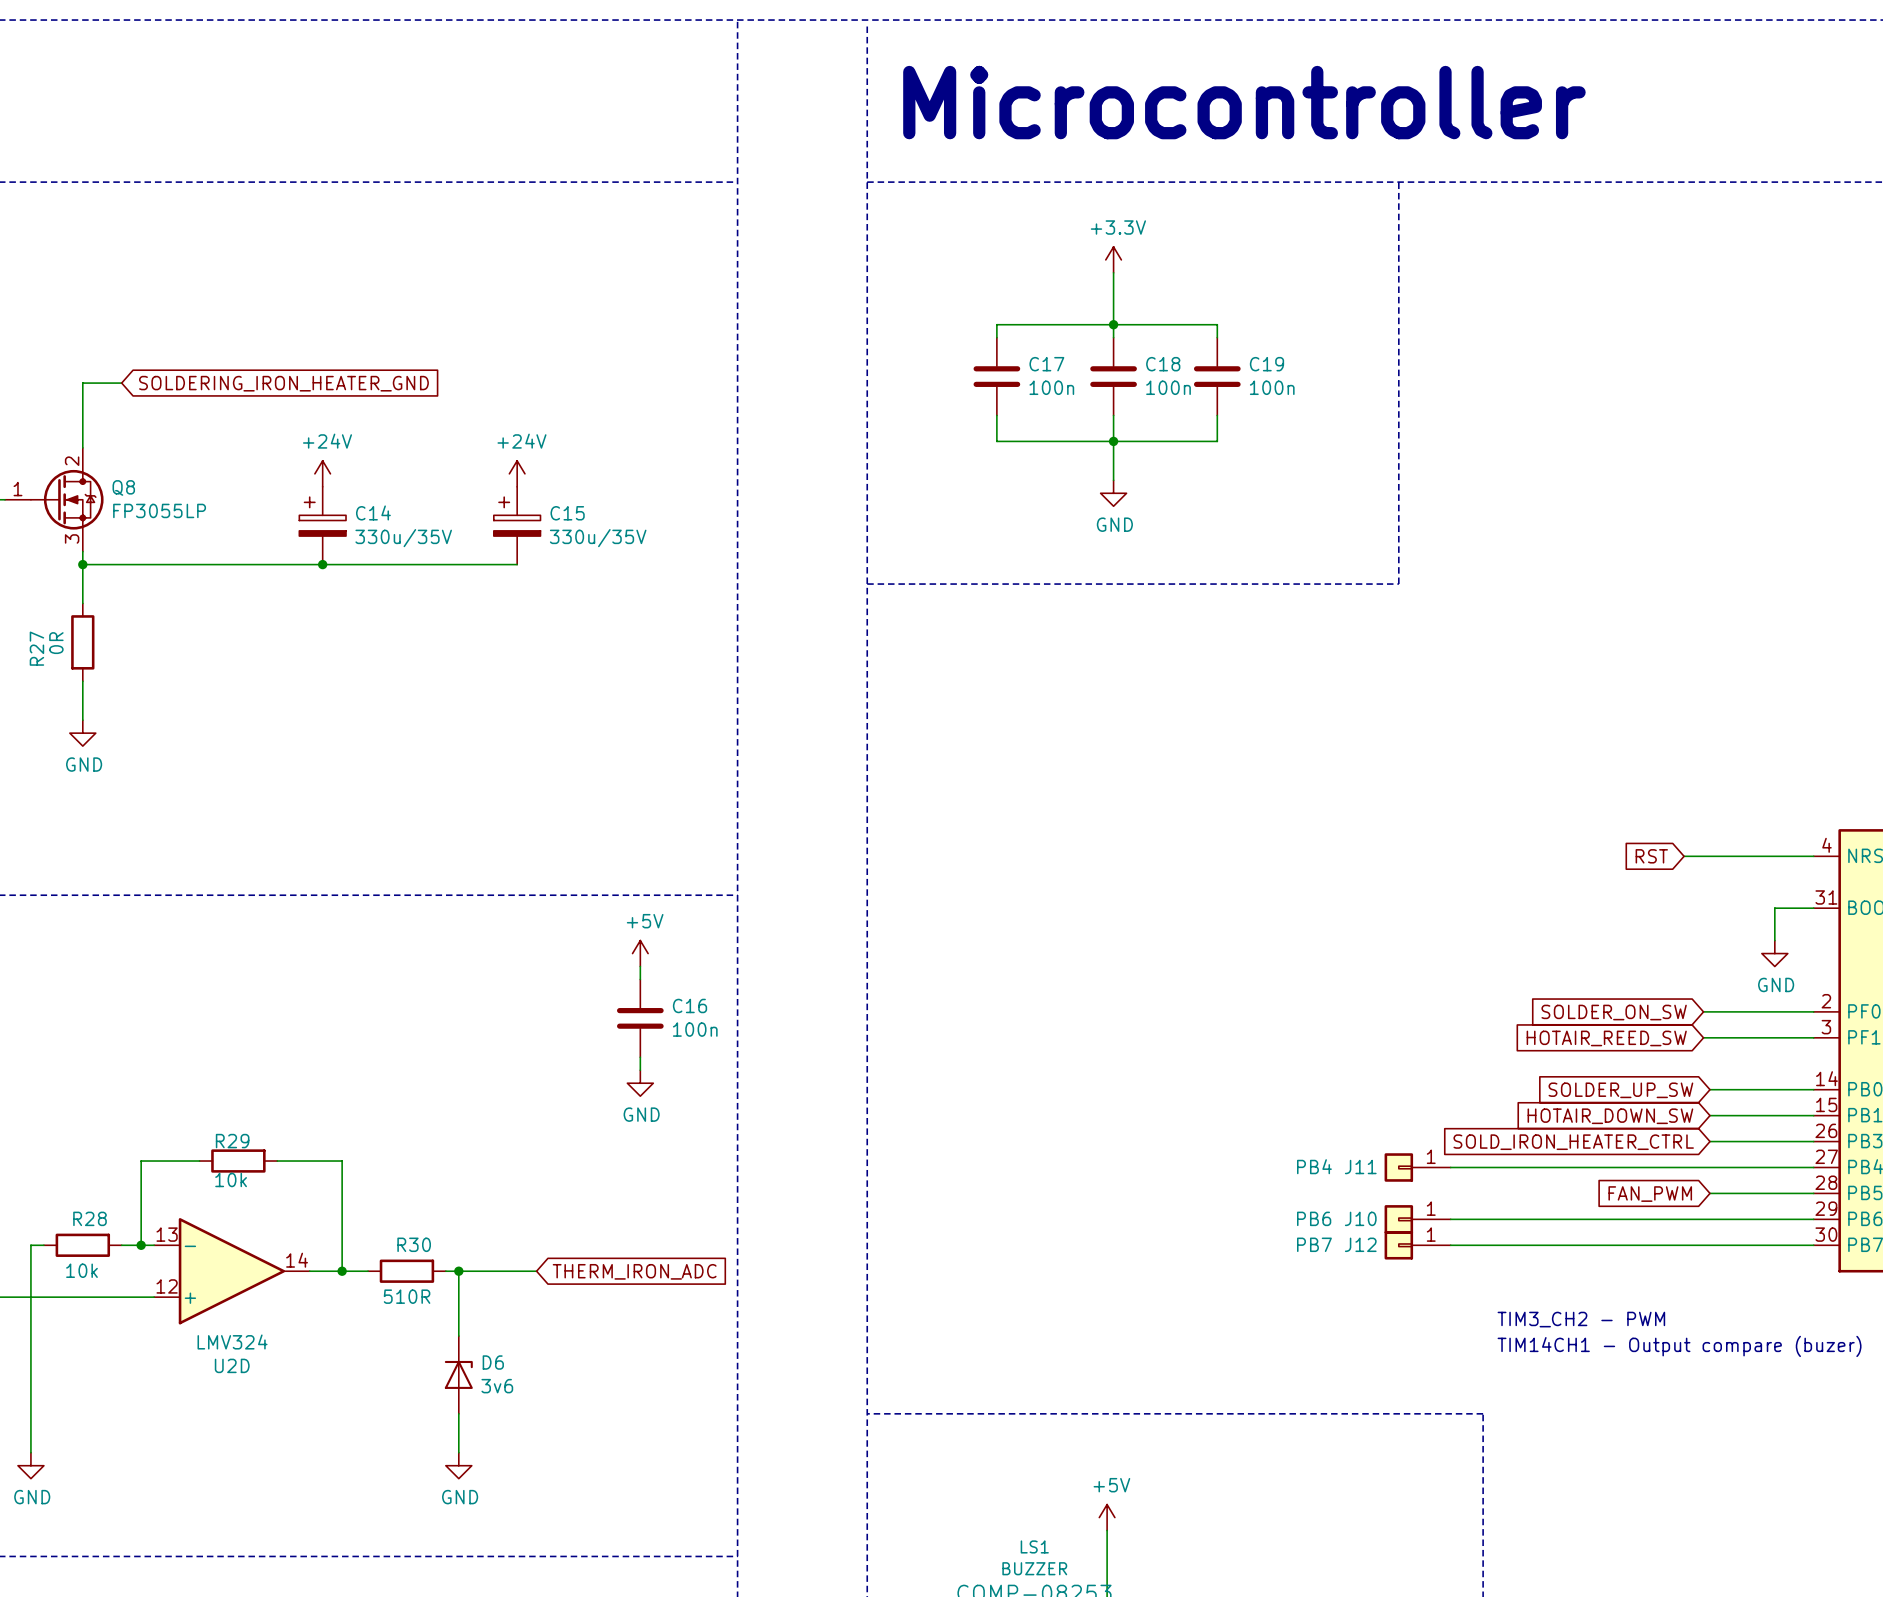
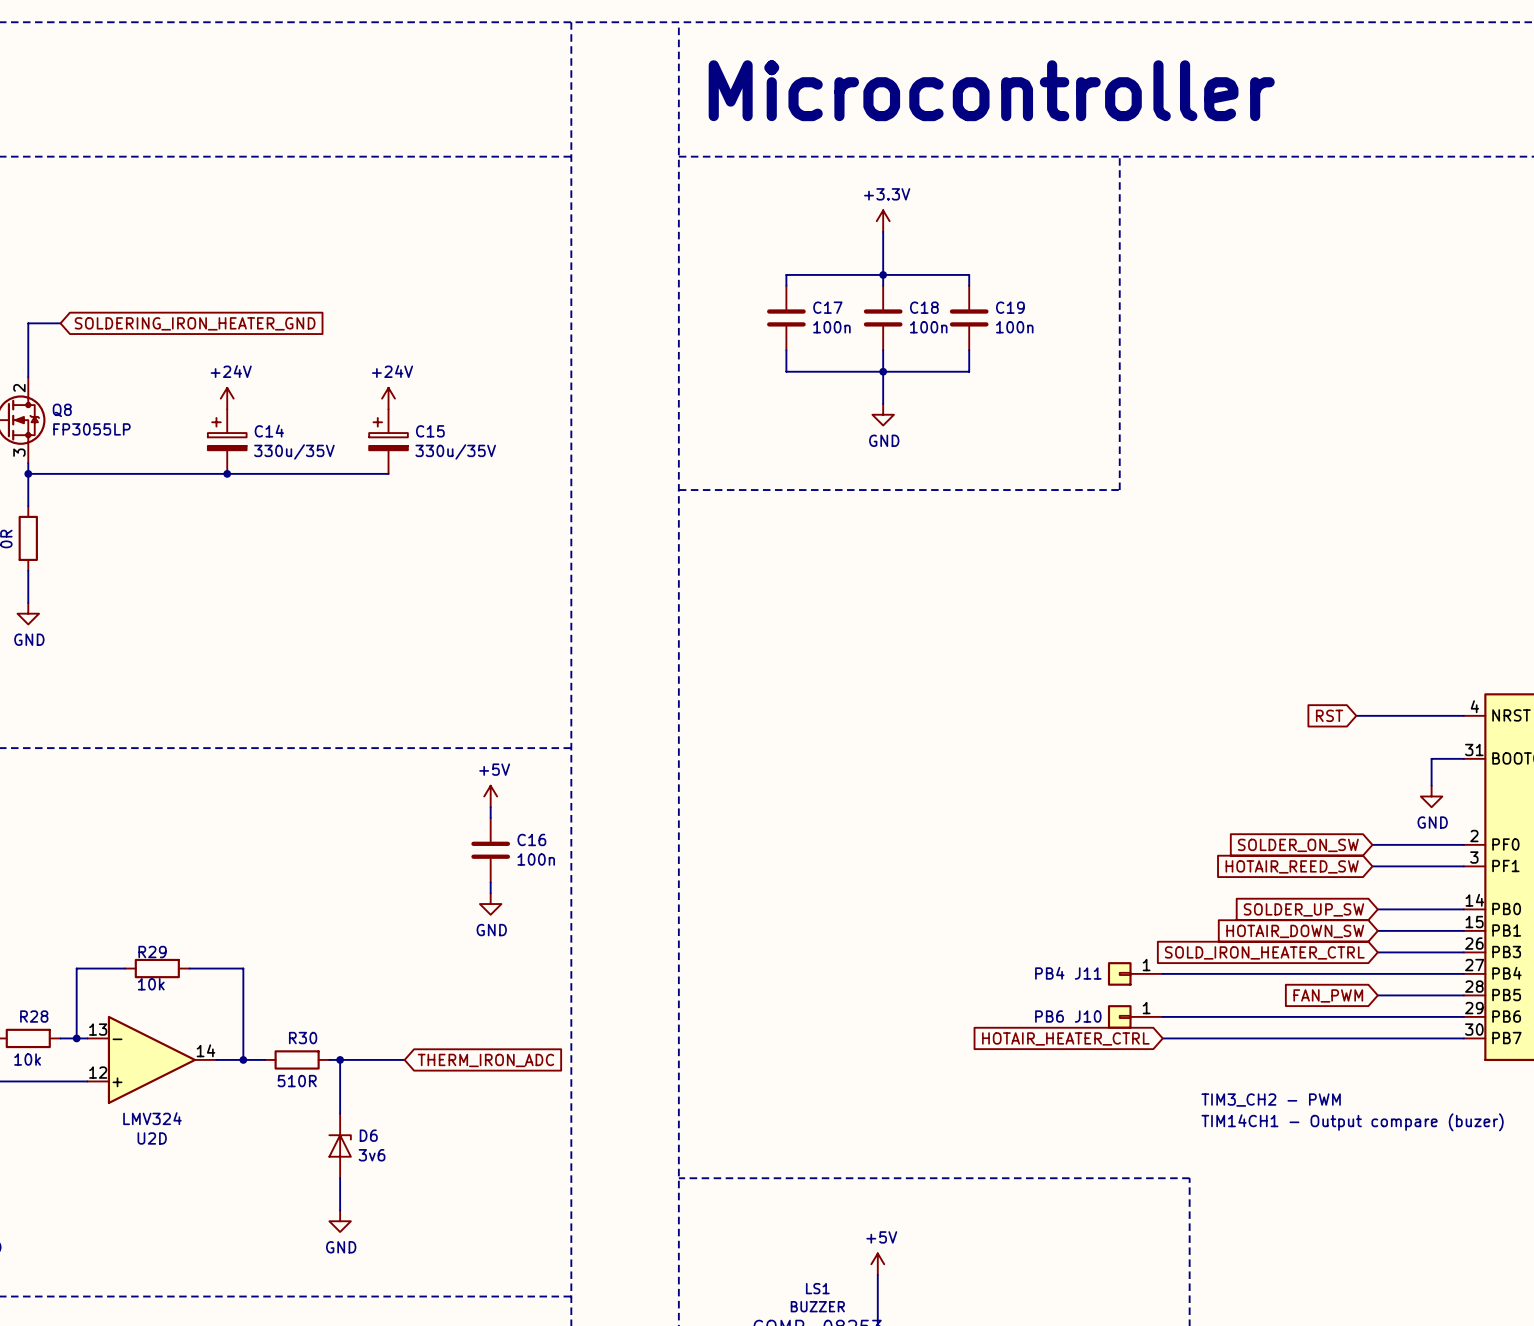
global label: none -> HOTAIR_HEATER_CTRL (1065, 1038)
J12: PB7 (1417, 1245) -> none

